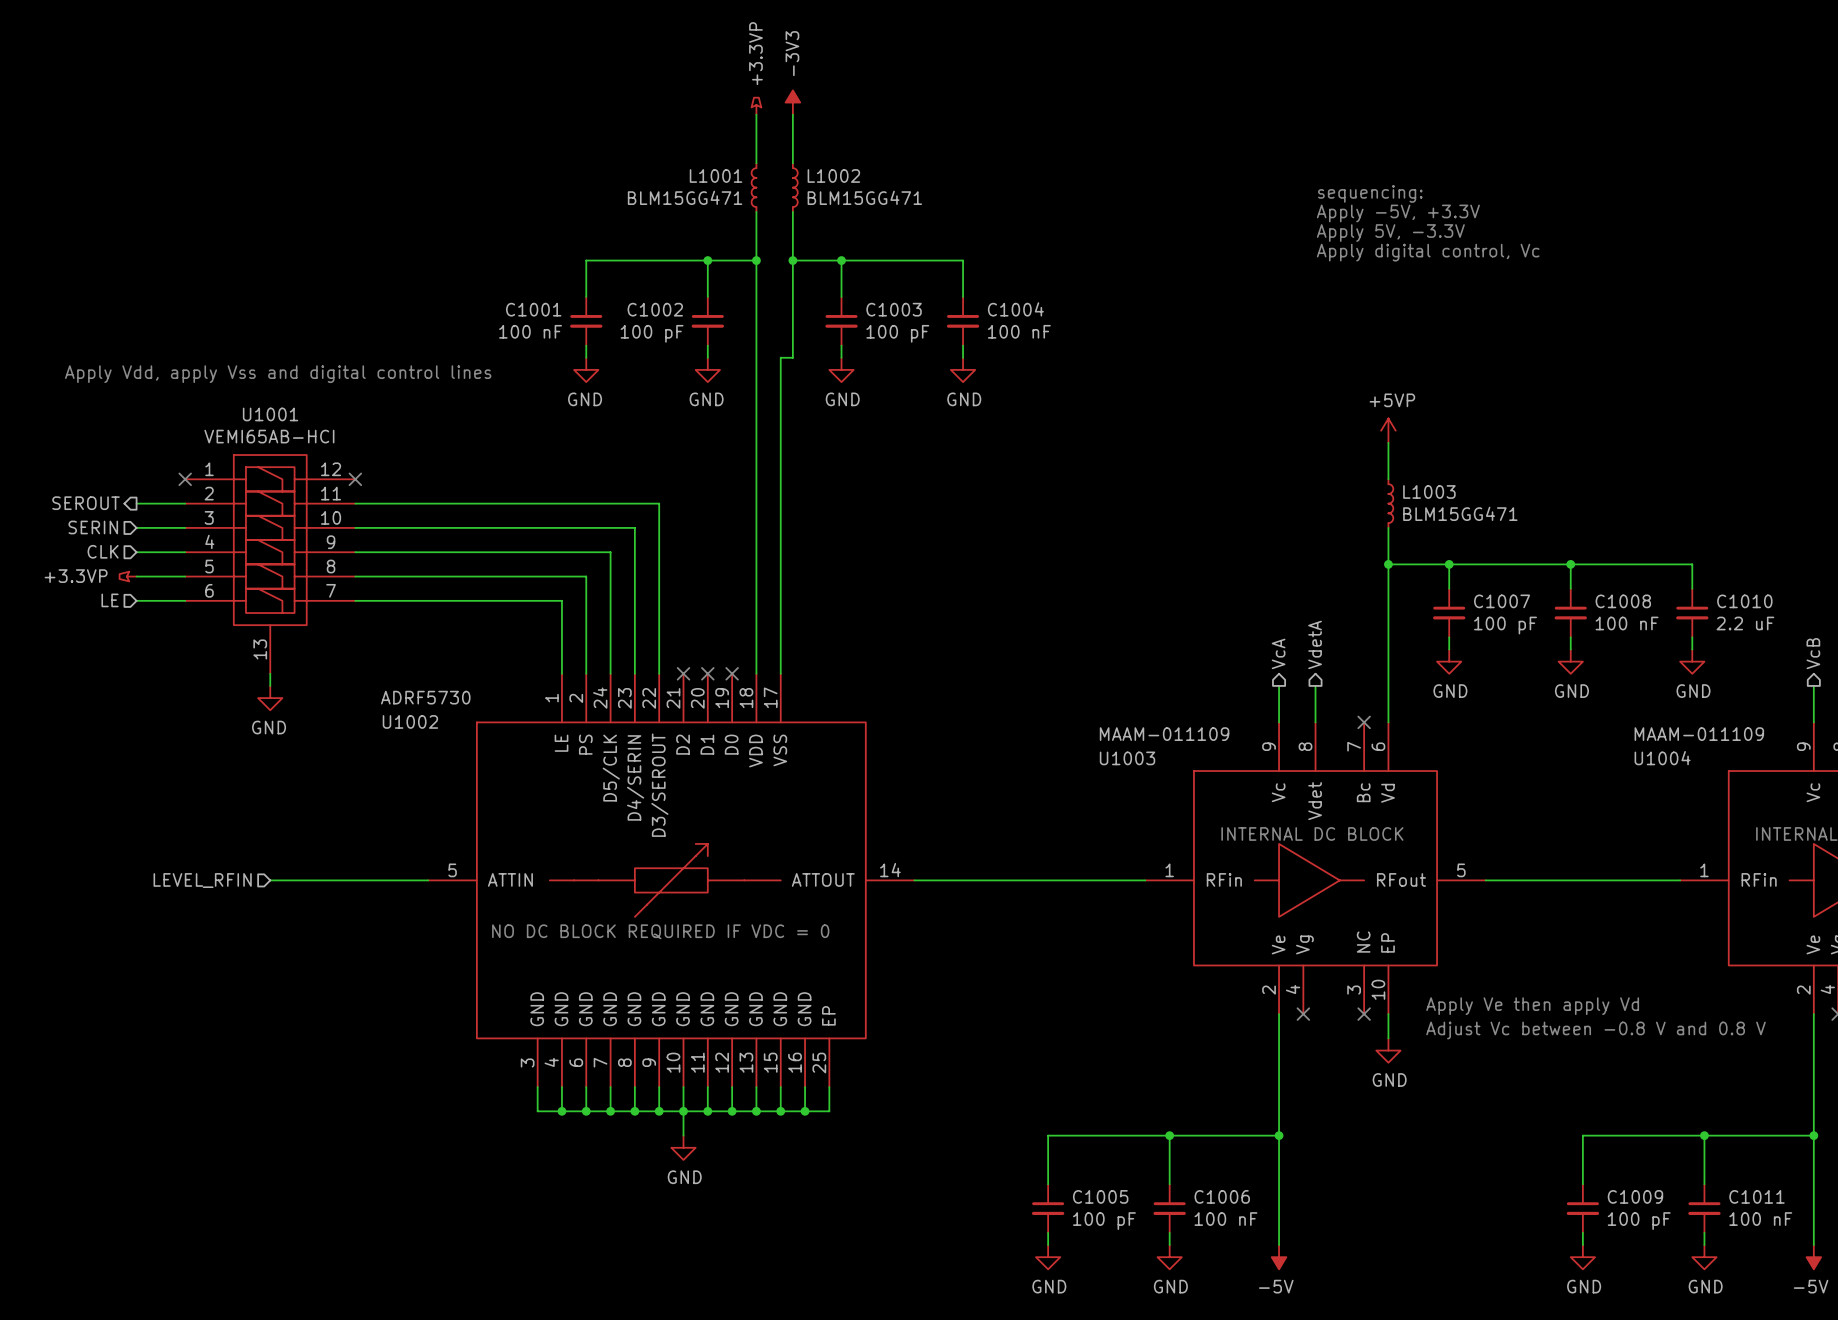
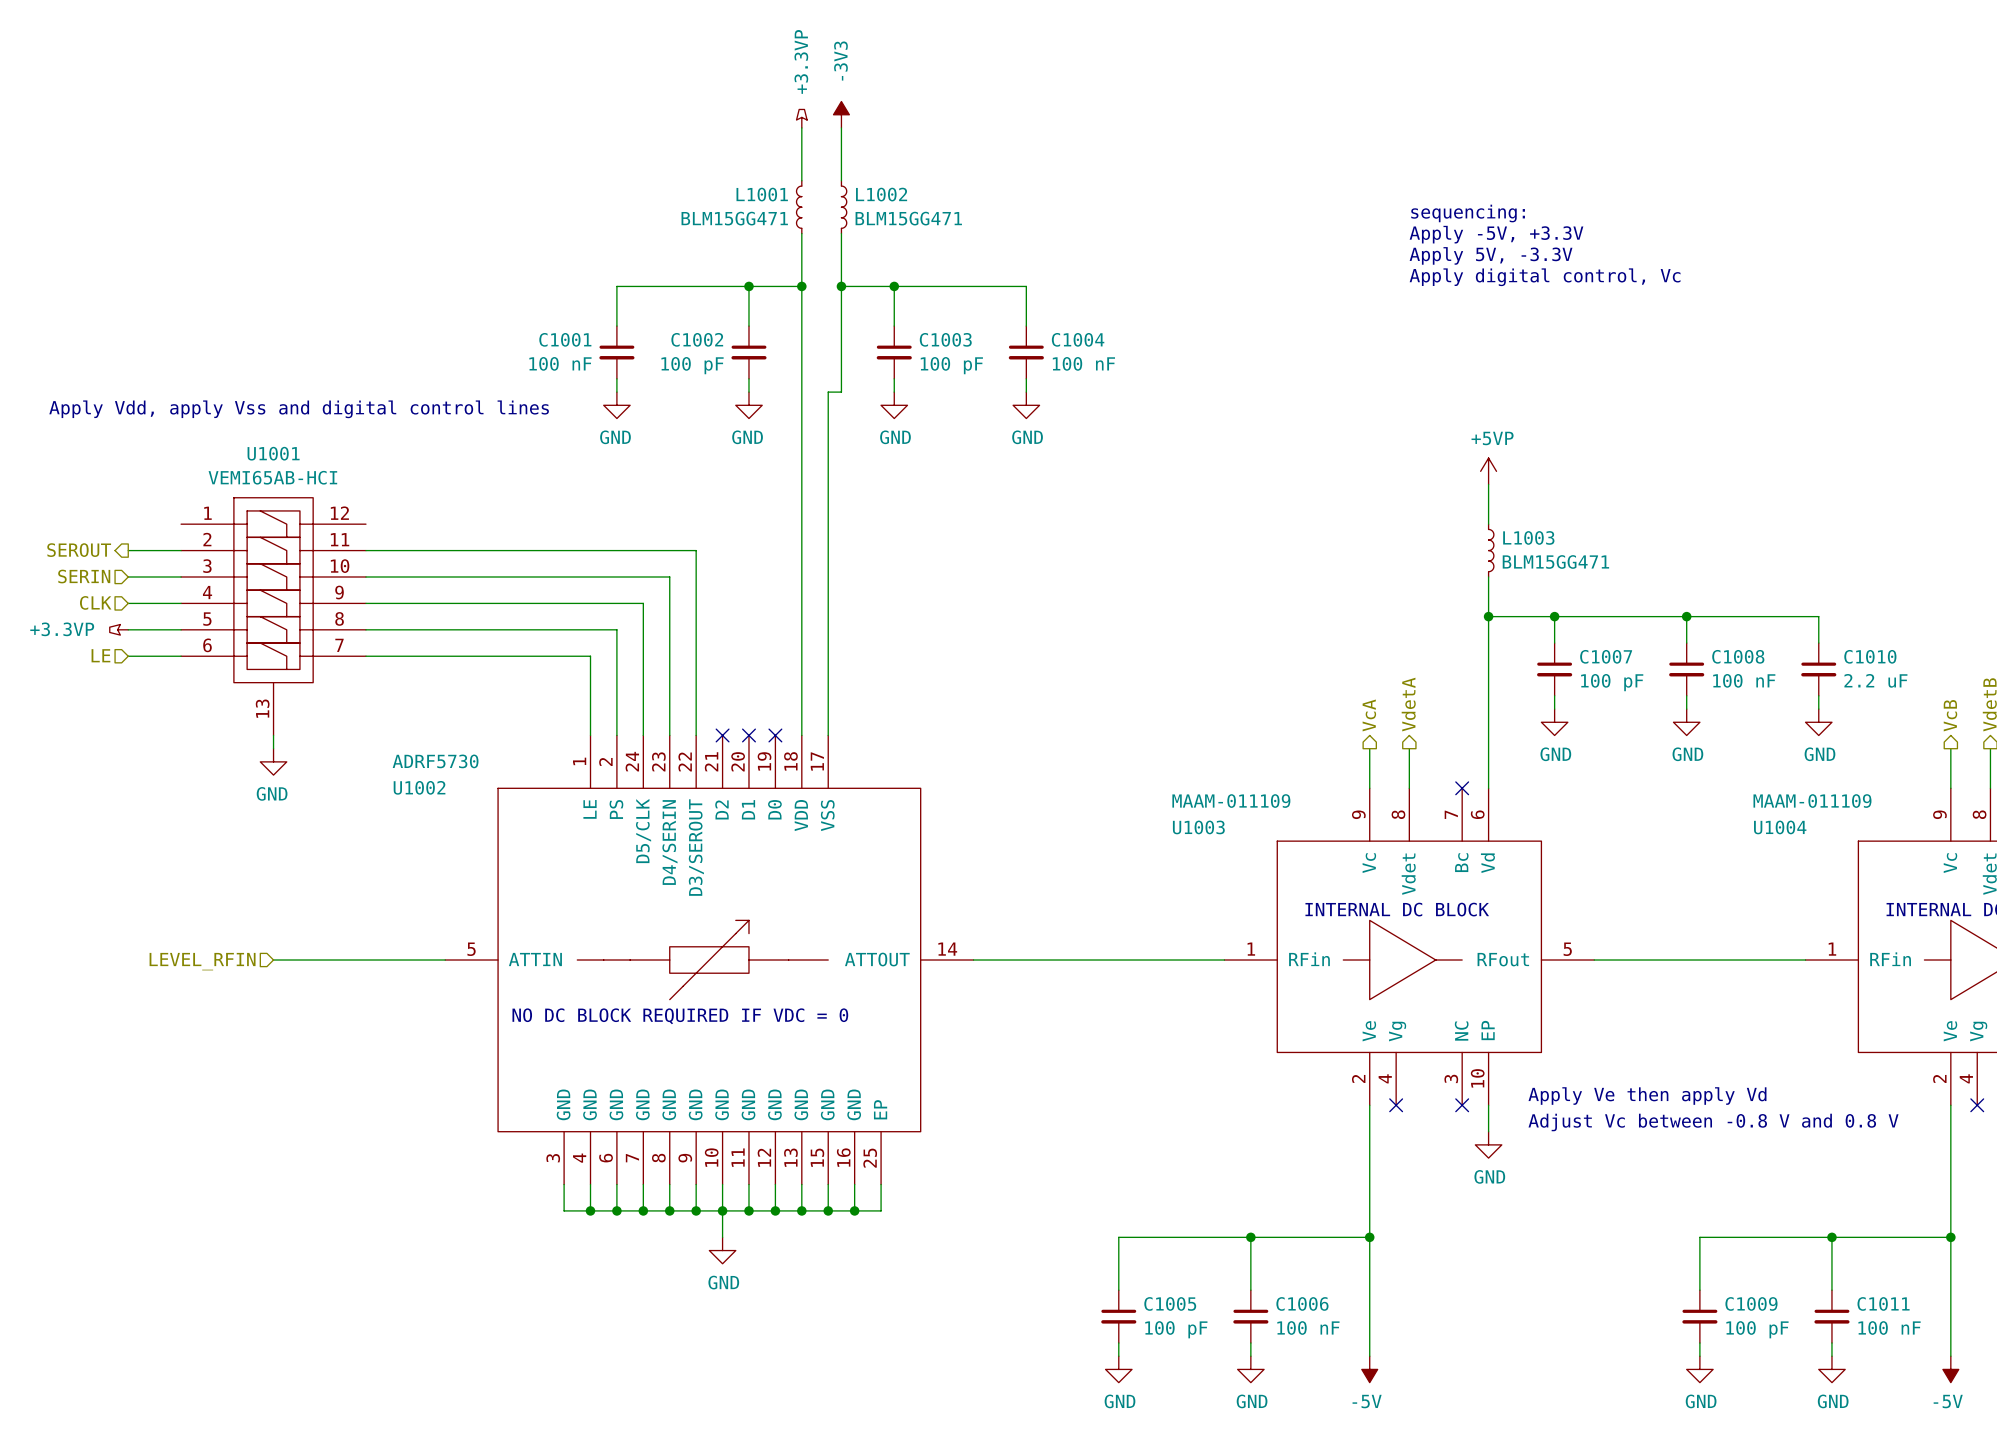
no-connect mark: (185, 479) -> none
no-connect mark: (355, 479) -> none

